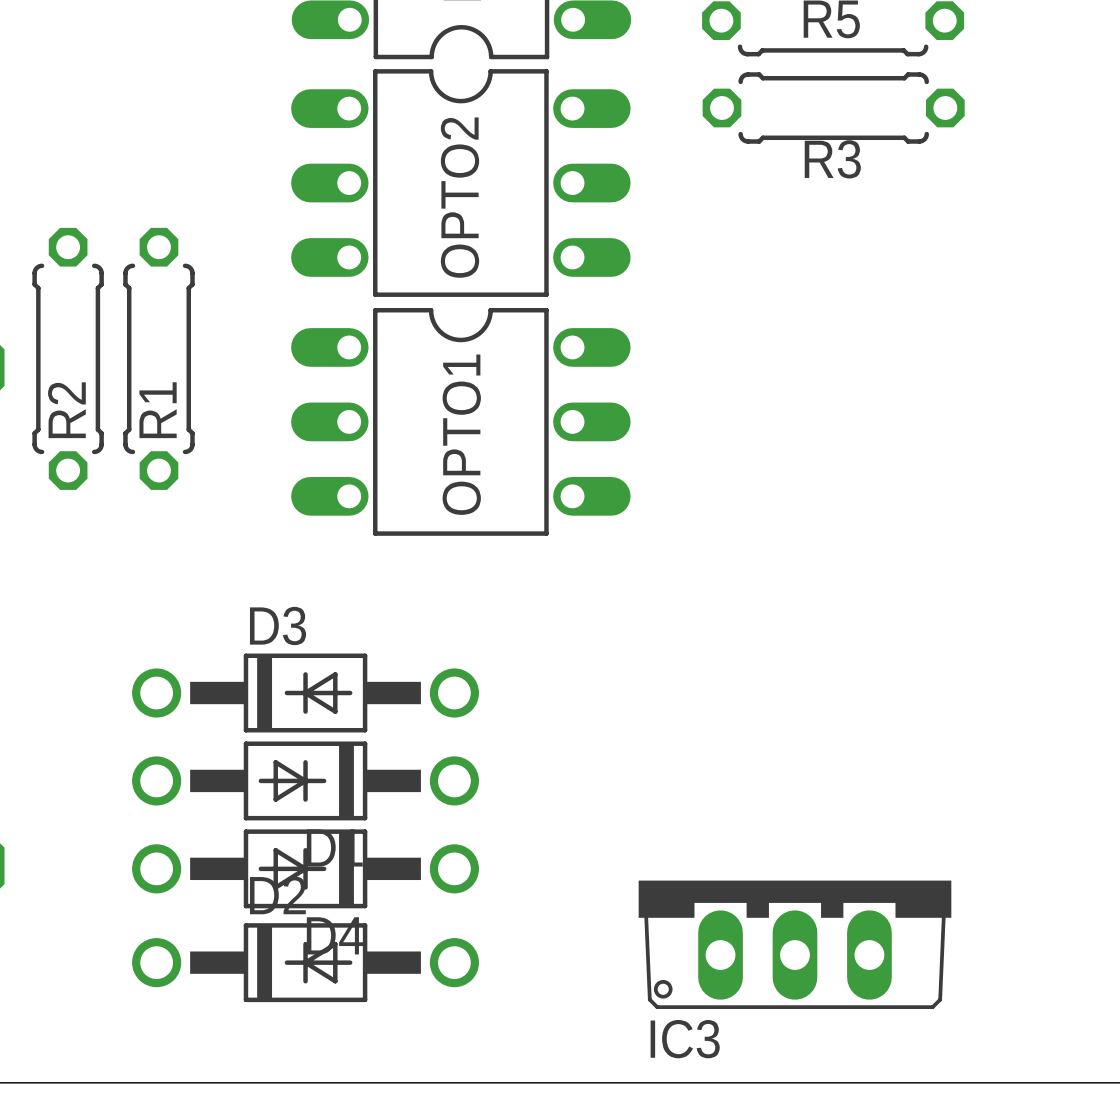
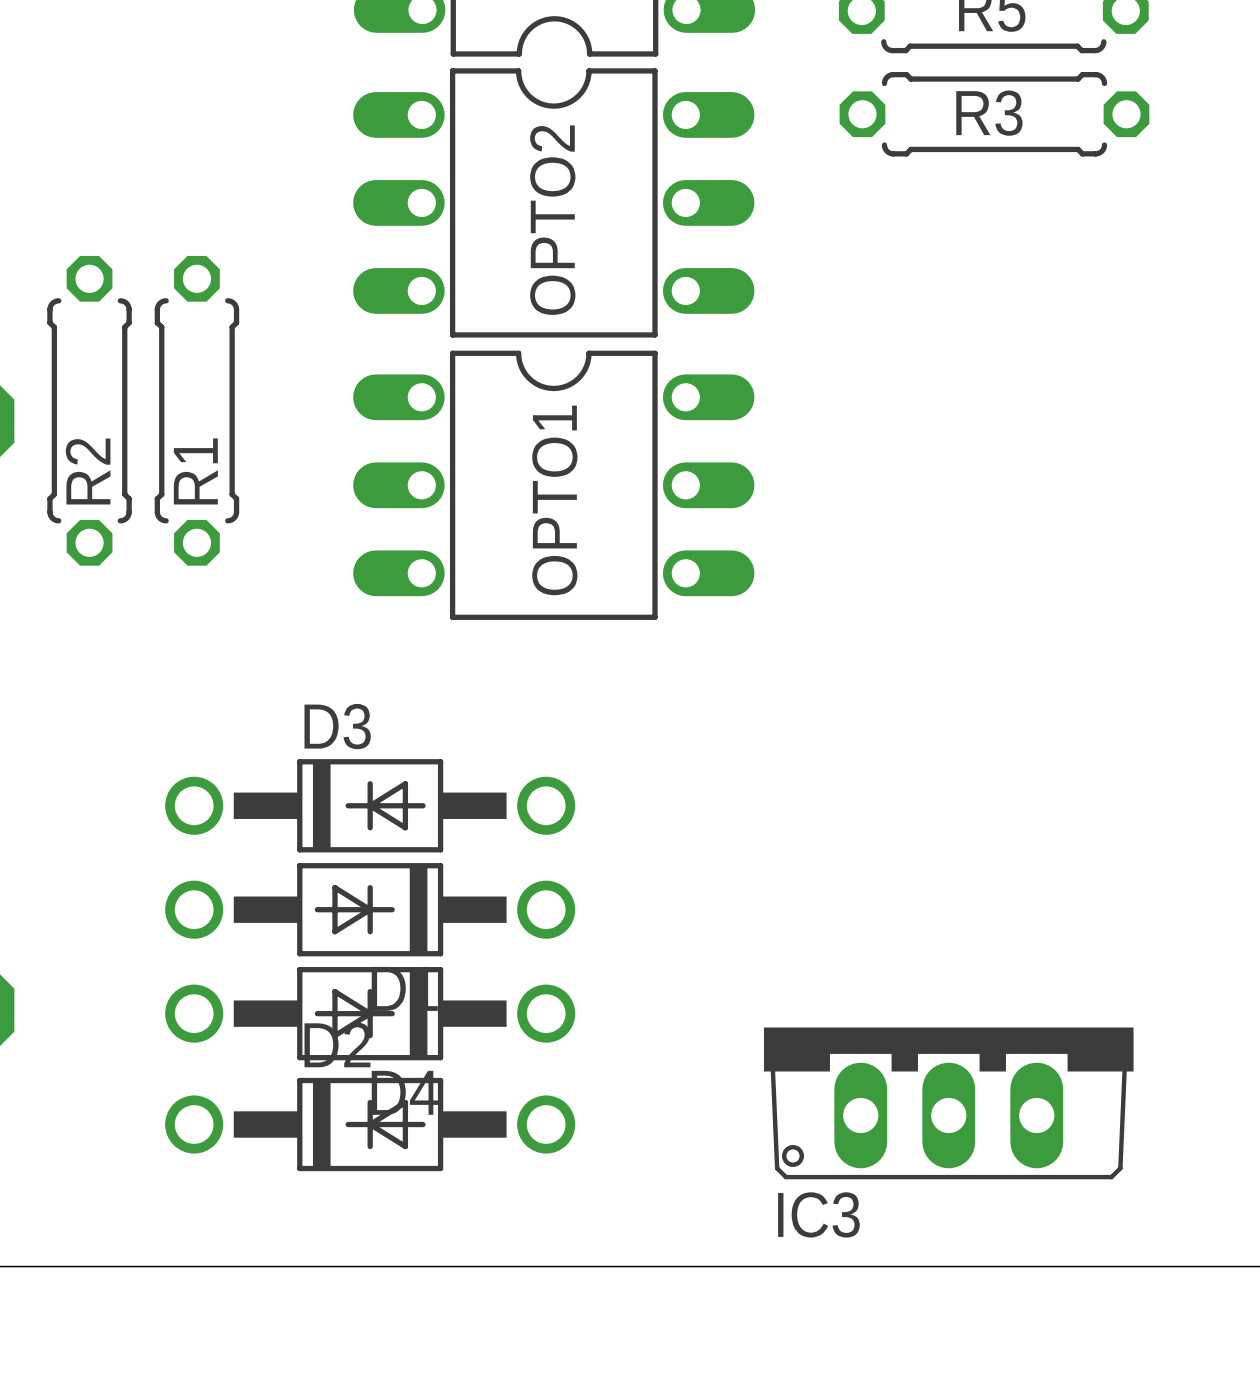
R3 name position: R3 (832, 159) -> R3 (989, 113)

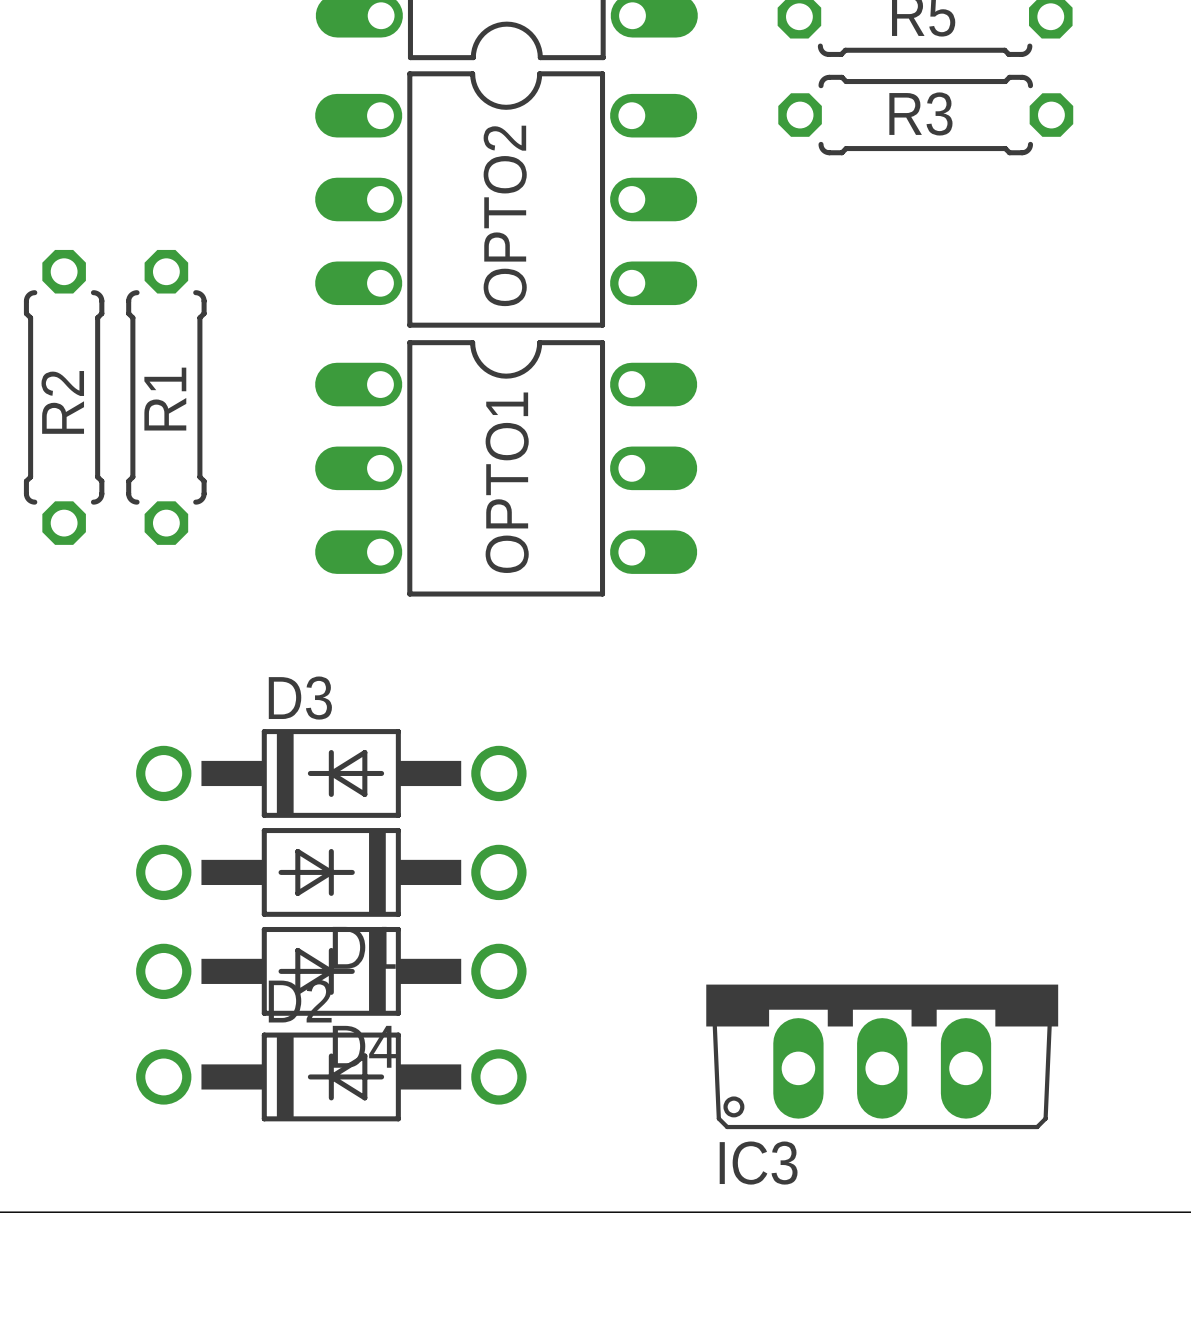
R2 name position: R2 (88, 471) -> R2 (62, 402)
R1 name position: R1 (195, 471) -> R1 (165, 399)

